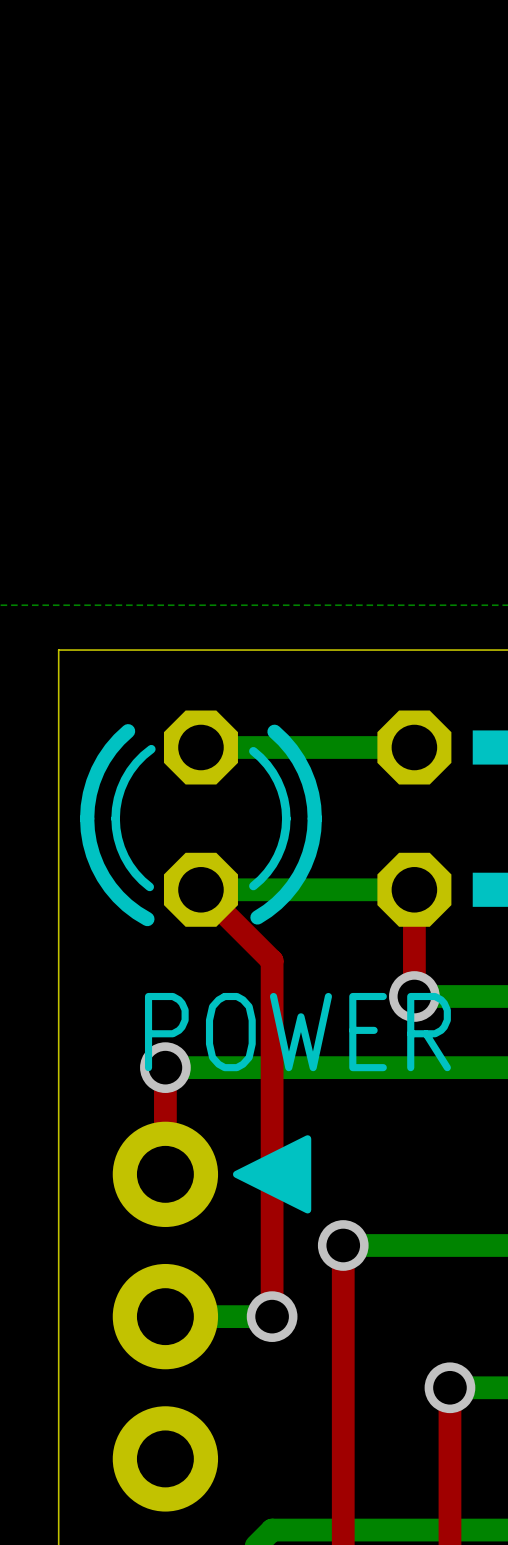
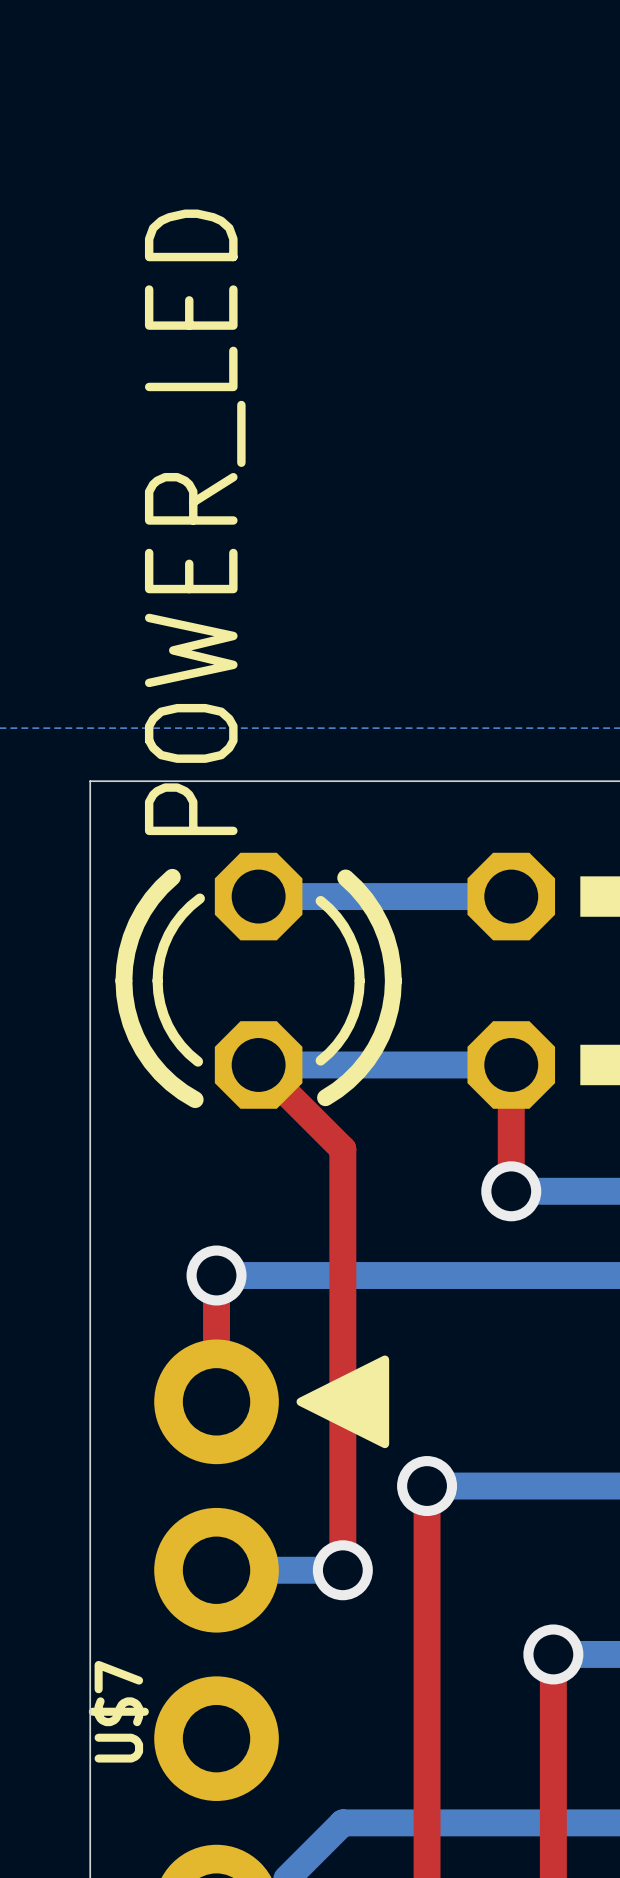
POWER name: POWER (297, 1032) -> POWER_LED (195, 522)
U$7 name: none -> U$7 (118, 1711)

